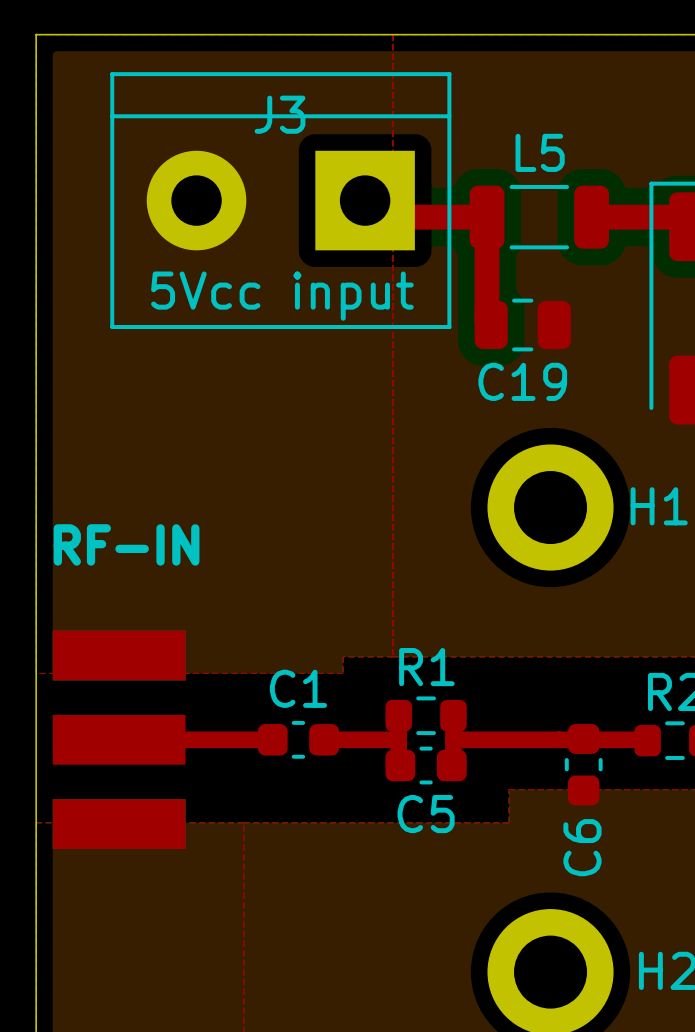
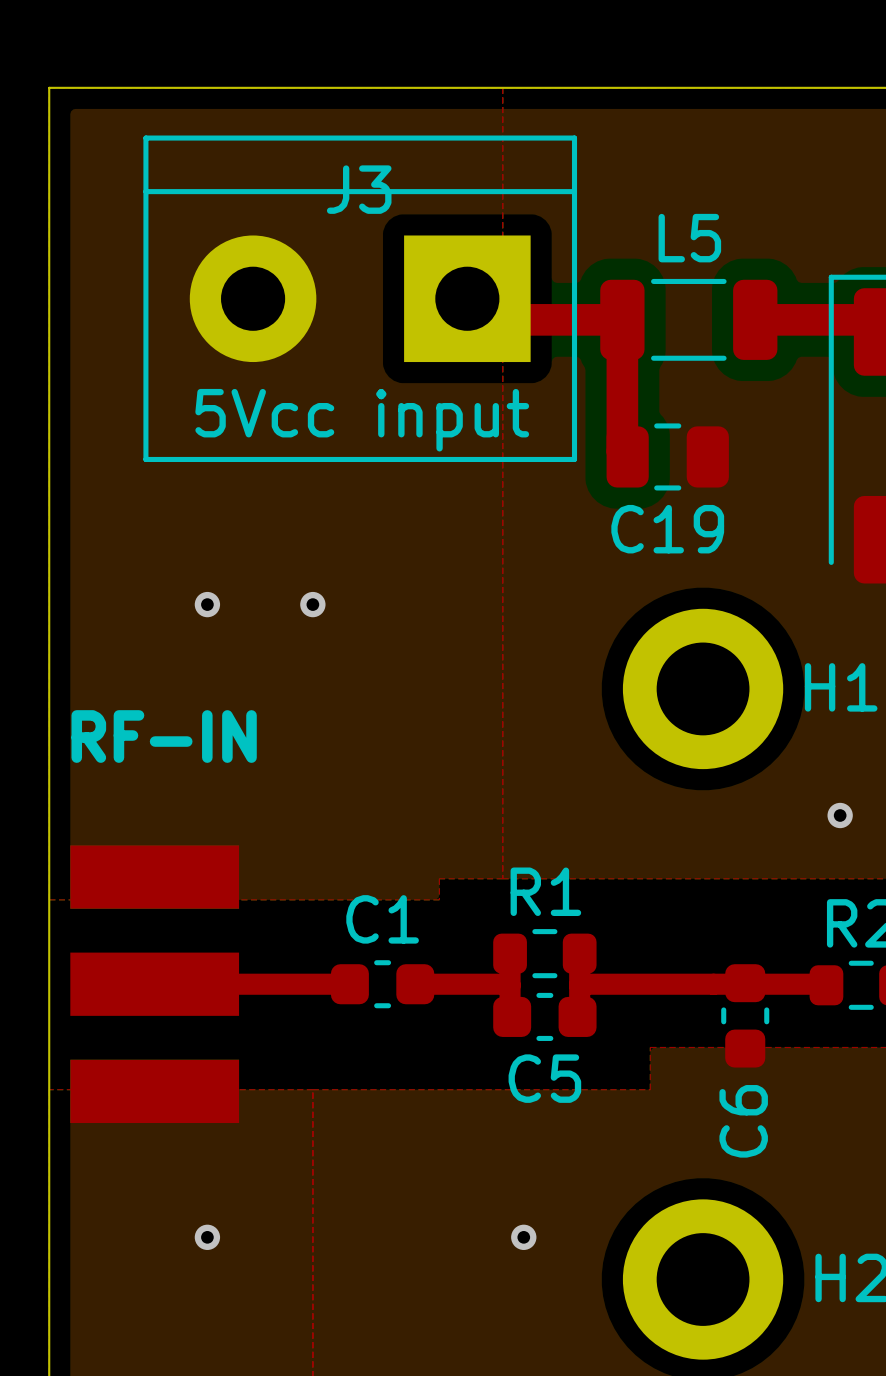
via: none -> (207, 604)
via: none -> (312, 604)
via: none -> (840, 815)
via: none -> (207, 1237)
via: none -> (523, 1237)

